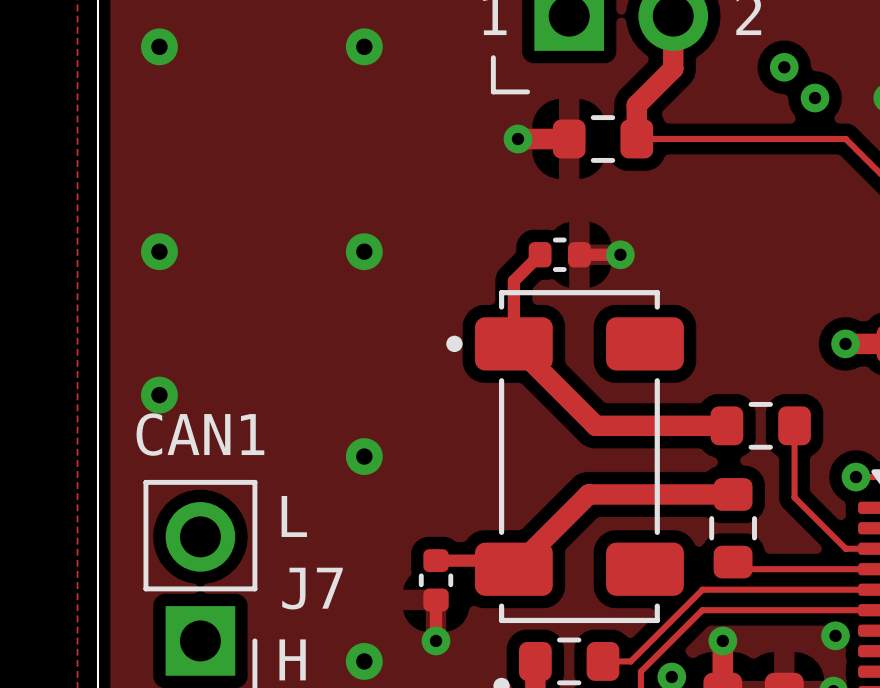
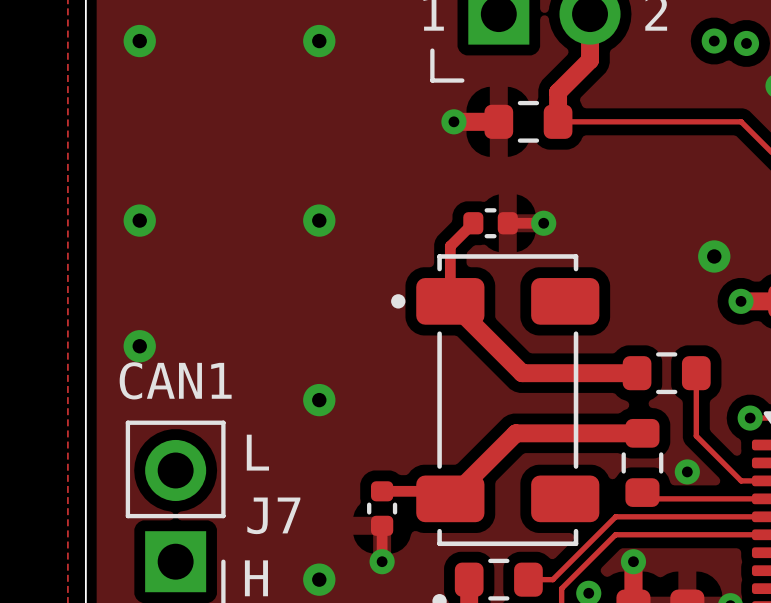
via: none -> (714, 41)
via: none -> (746, 43)
via: (784, 67) -> none
via: (815, 98) -> none
via: none -> (714, 256)
via: none -> (687, 471)
via: (835, 635) -> none

